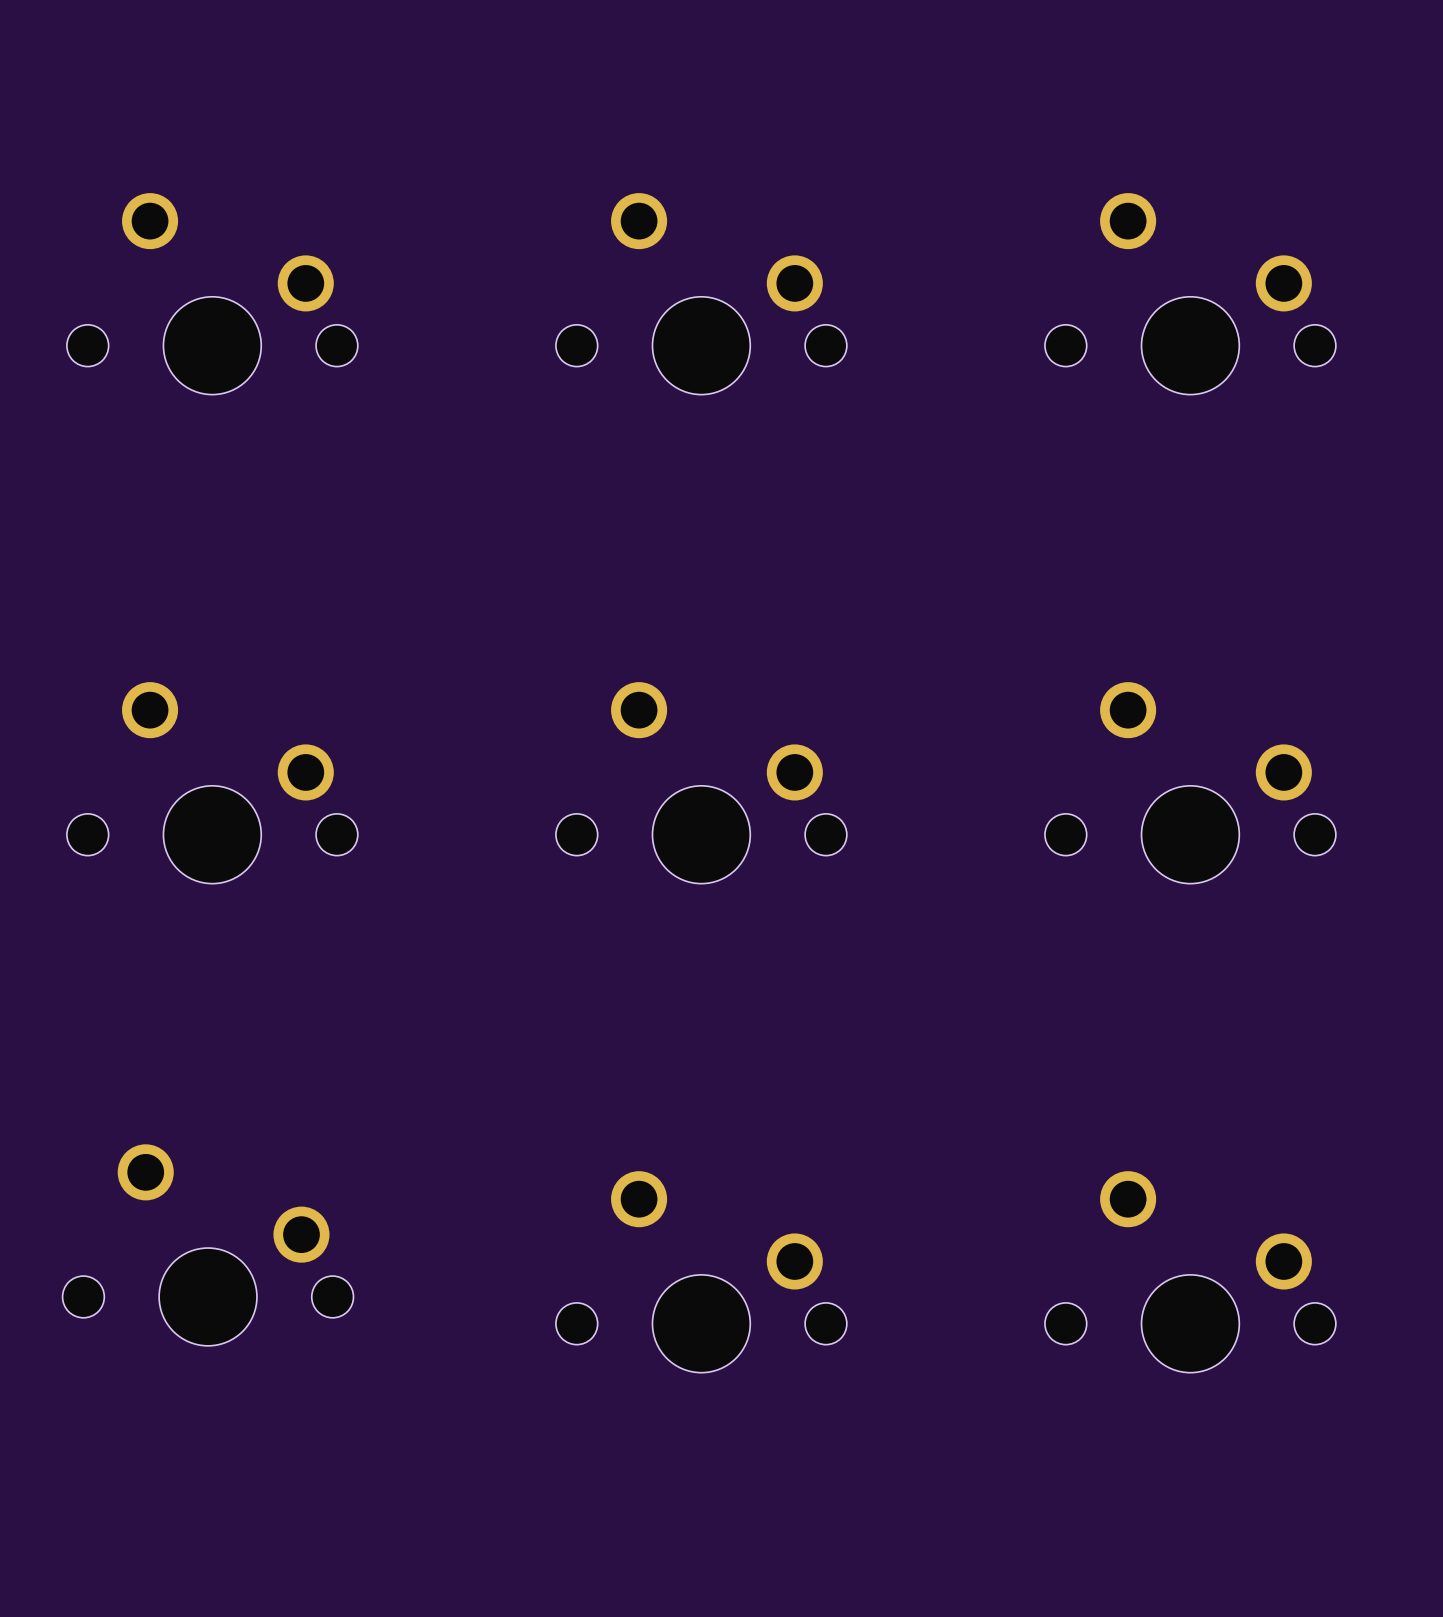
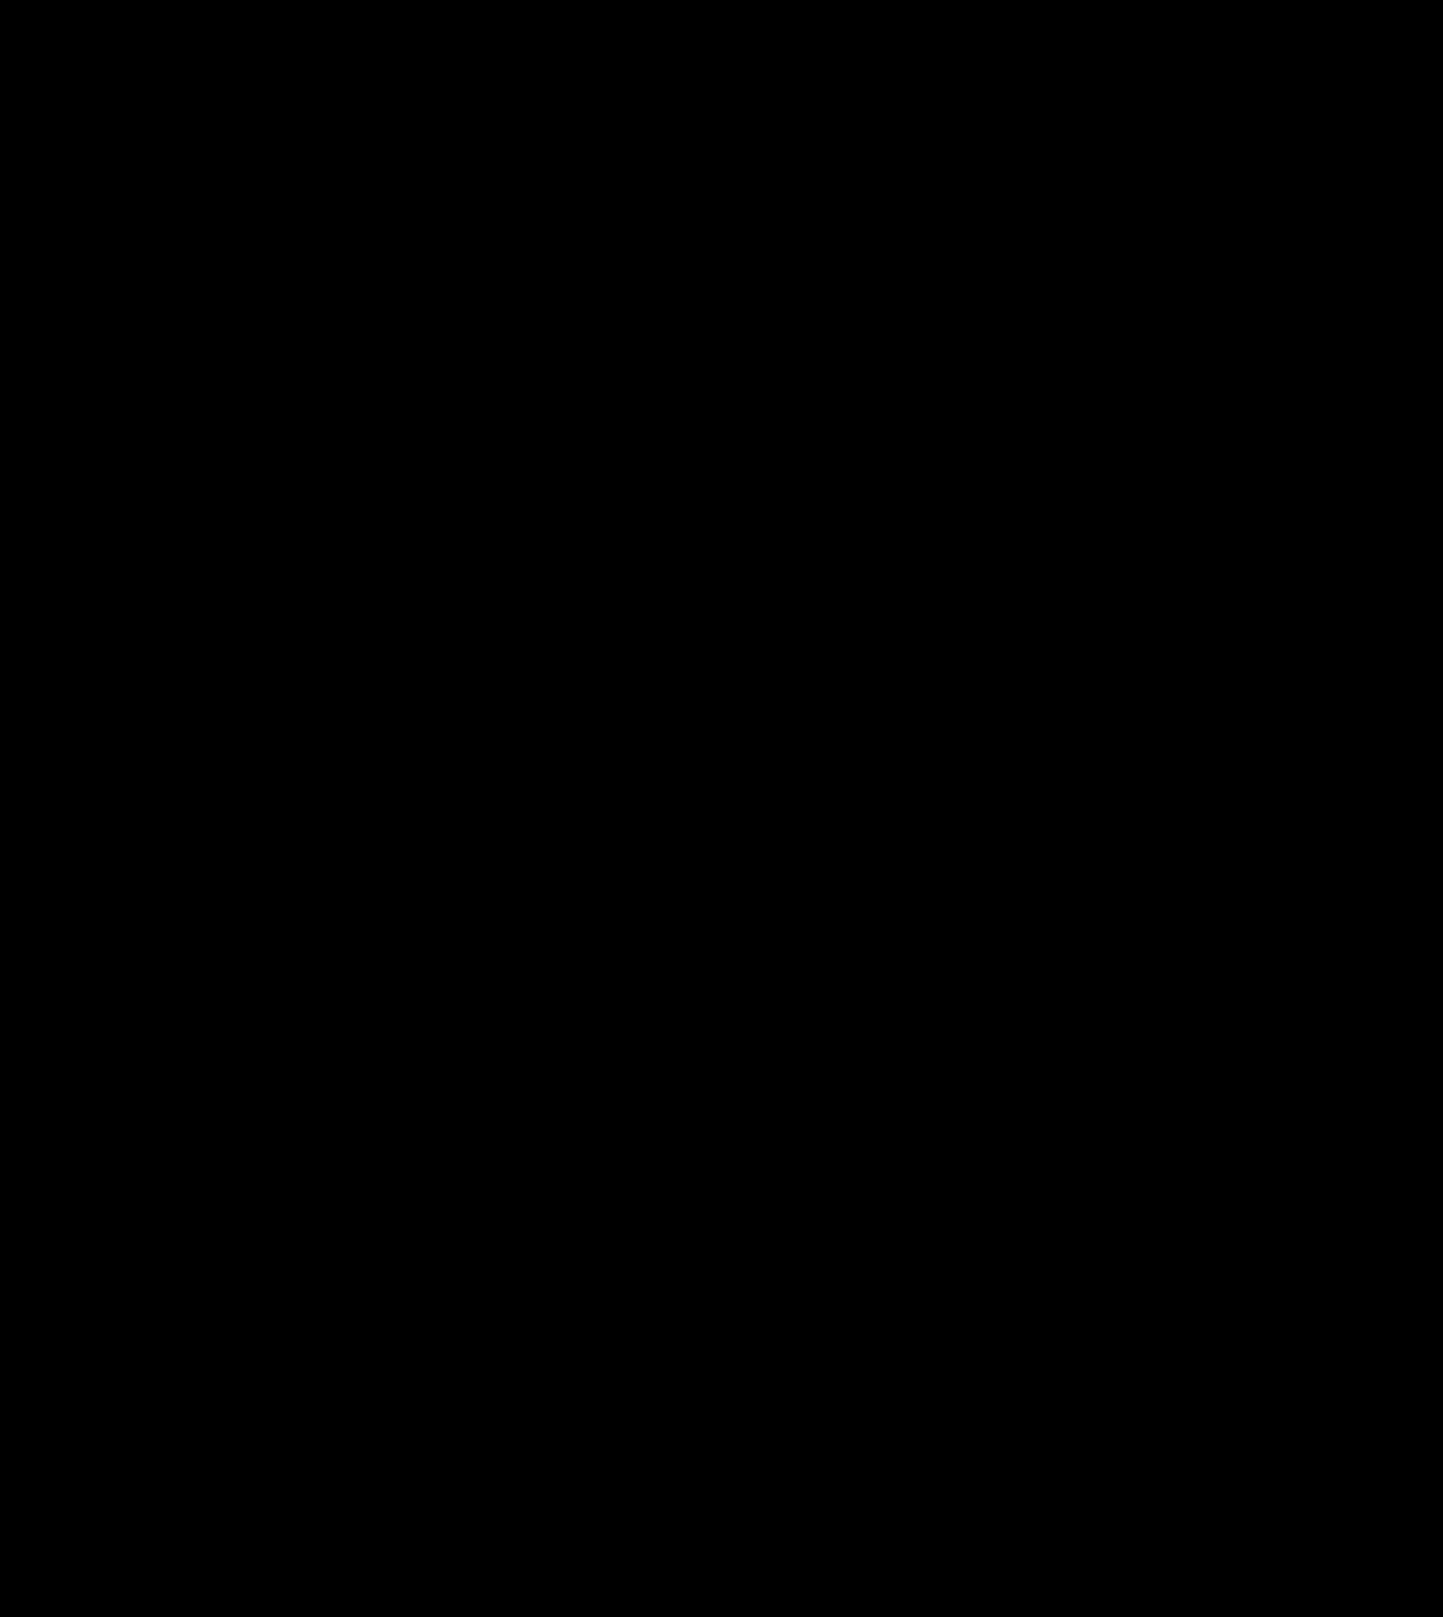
part: (212, 293) -> none
part: (701, 293) -> none
part: (1190, 293) -> none
part: (212, 782) -> none
part: (701, 782) -> none
part: (1190, 782) -> none
part: (208, 1245) -> none
part: (701, 1271) -> none
part: (1190, 1271) -> none

